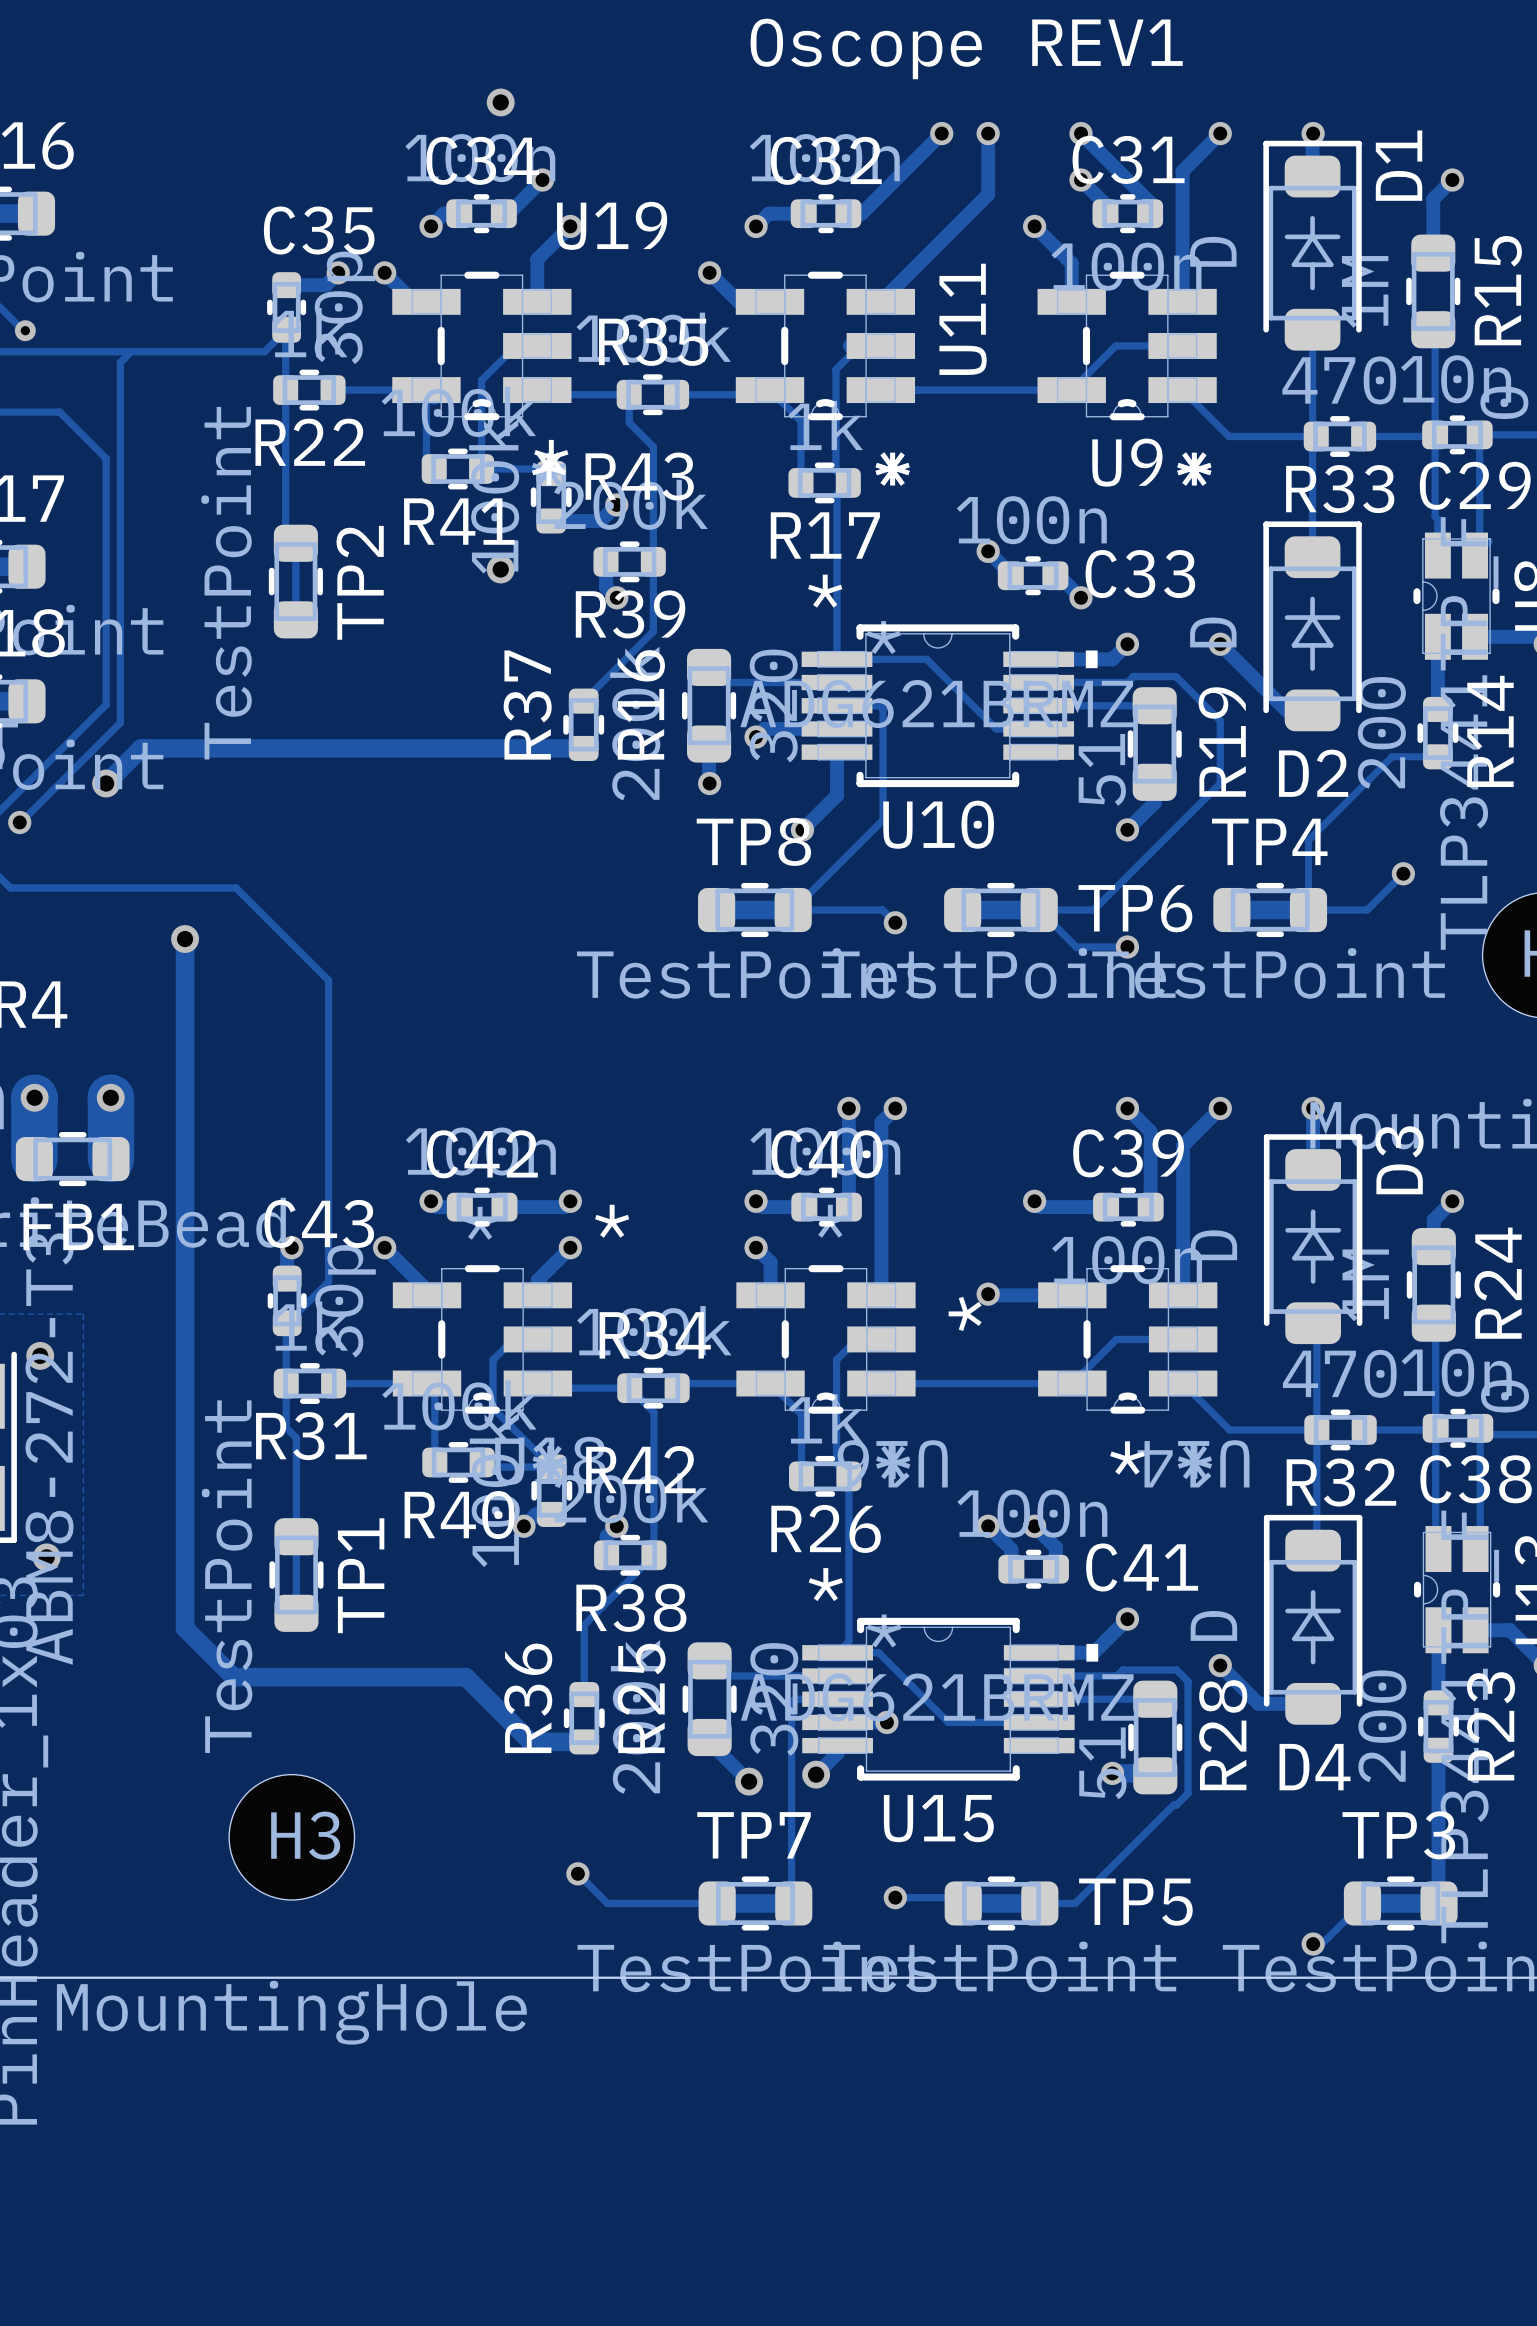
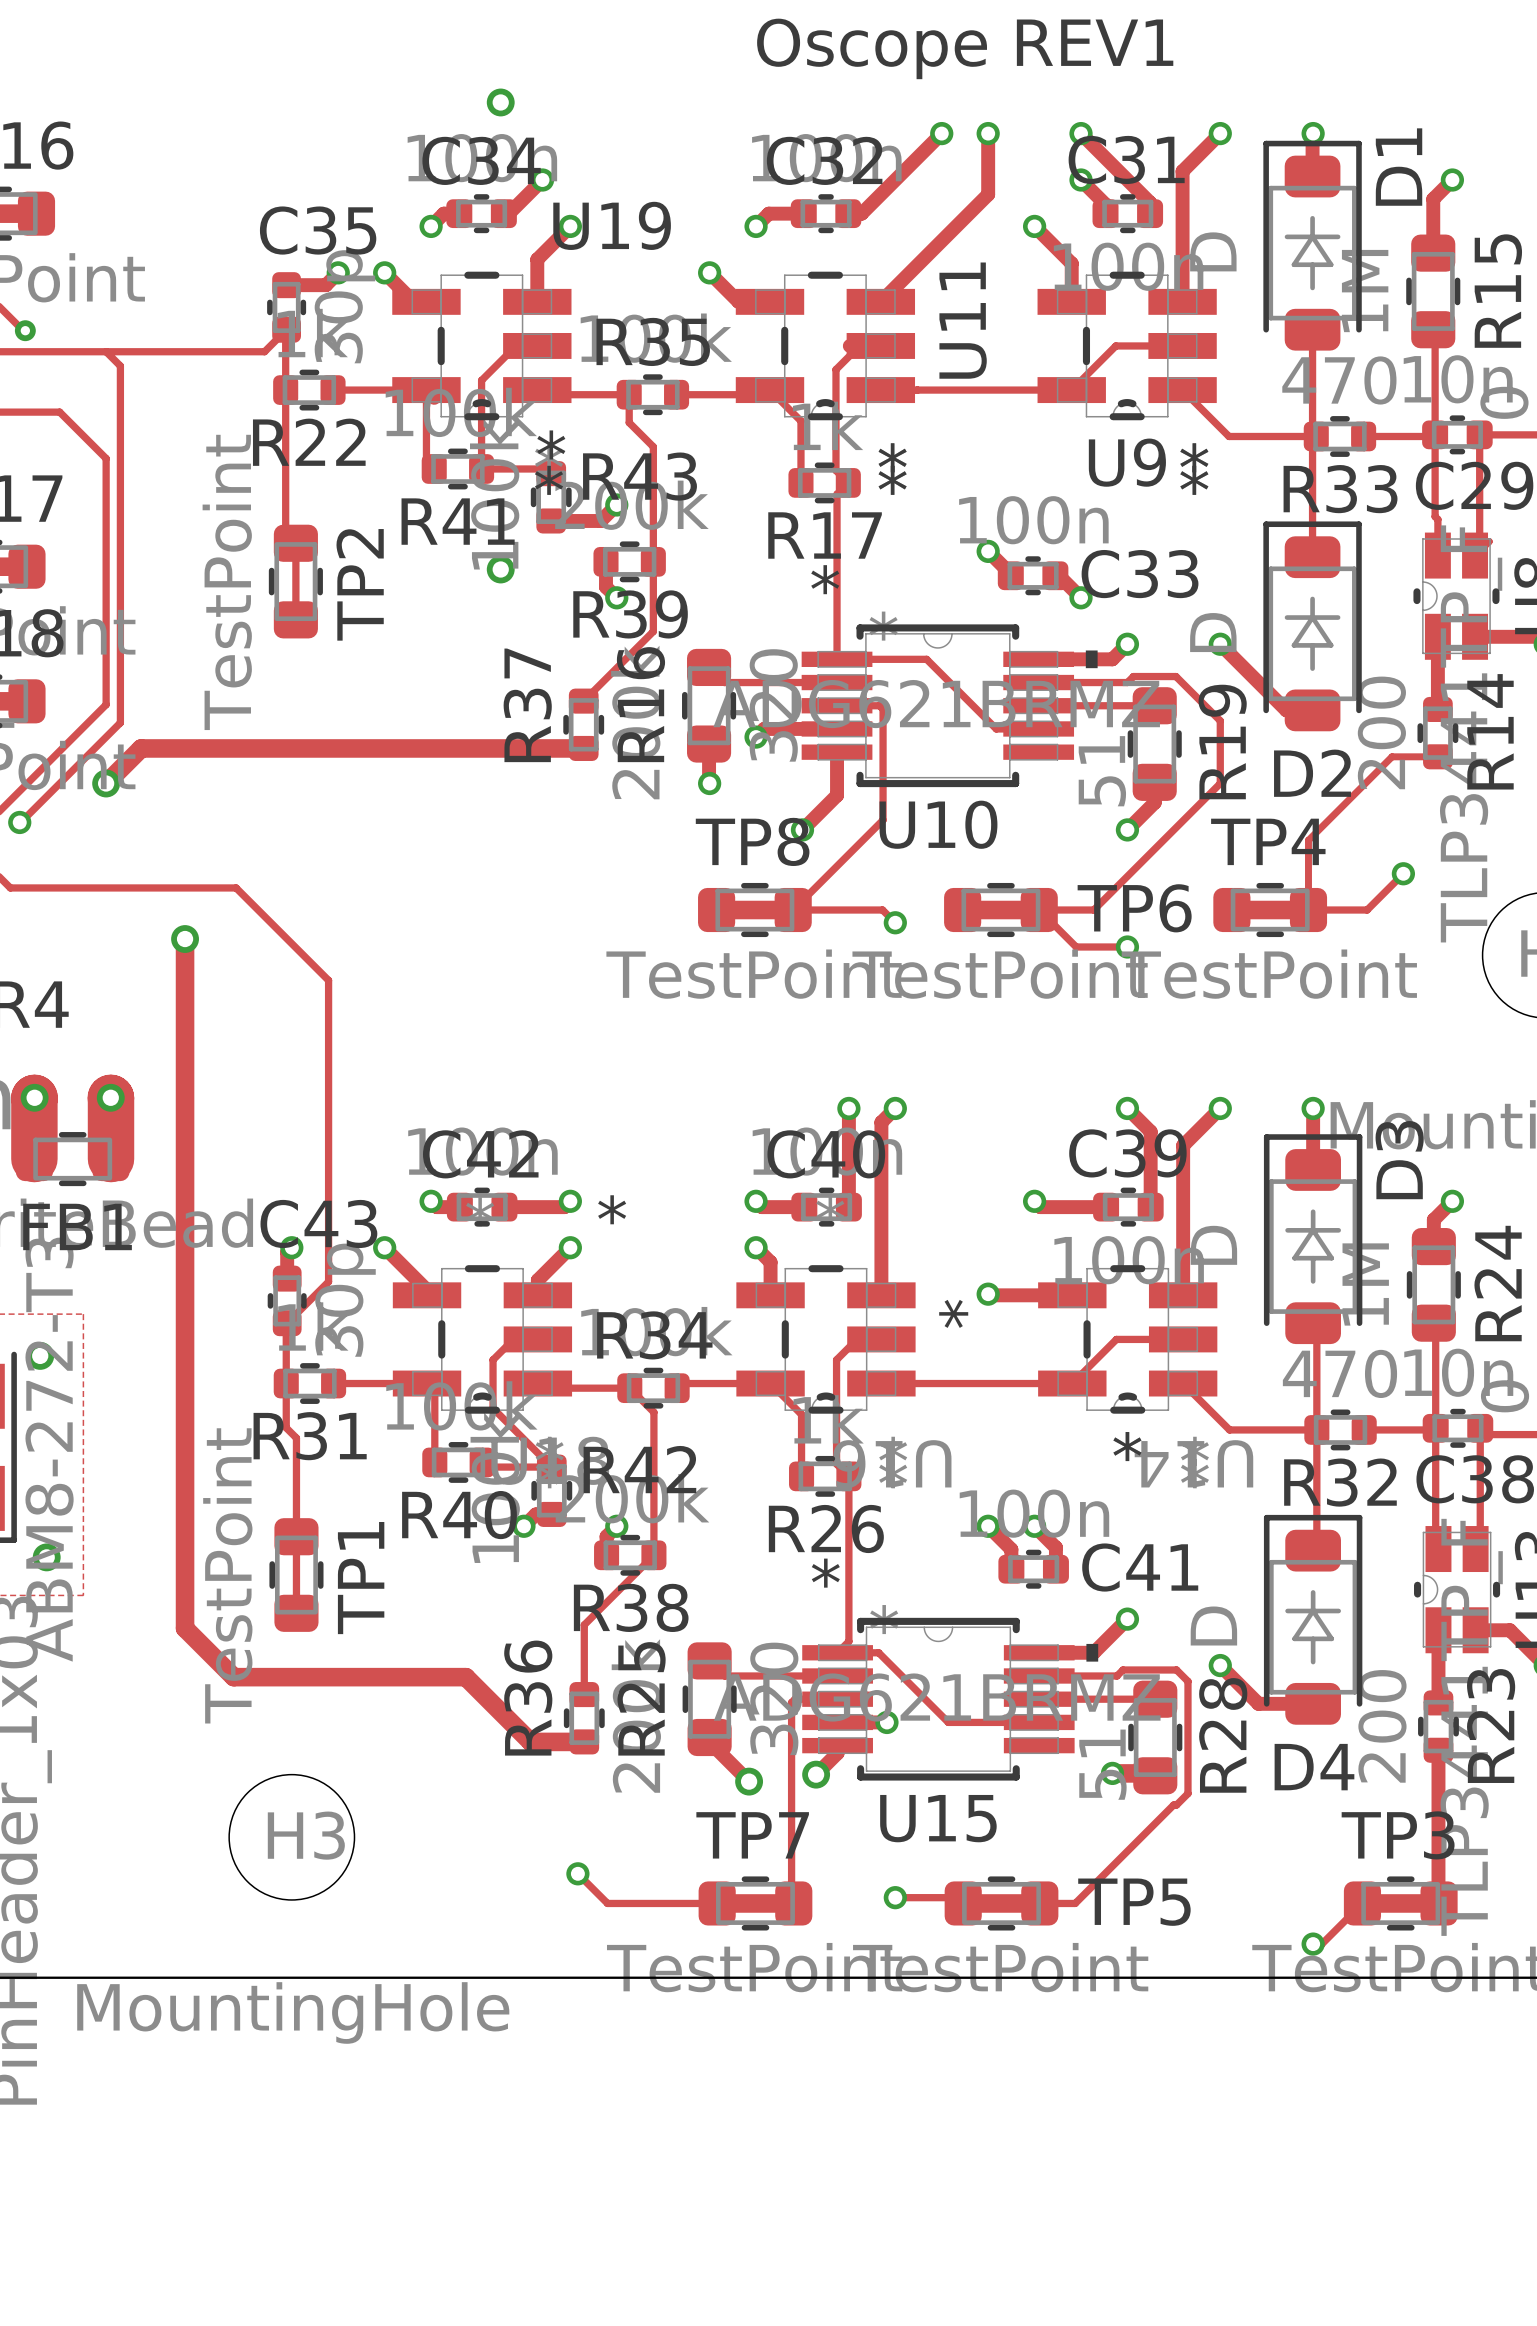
track: (131, 351) (120, 362) (120, 366) -> (106, 351) (120, 366)

